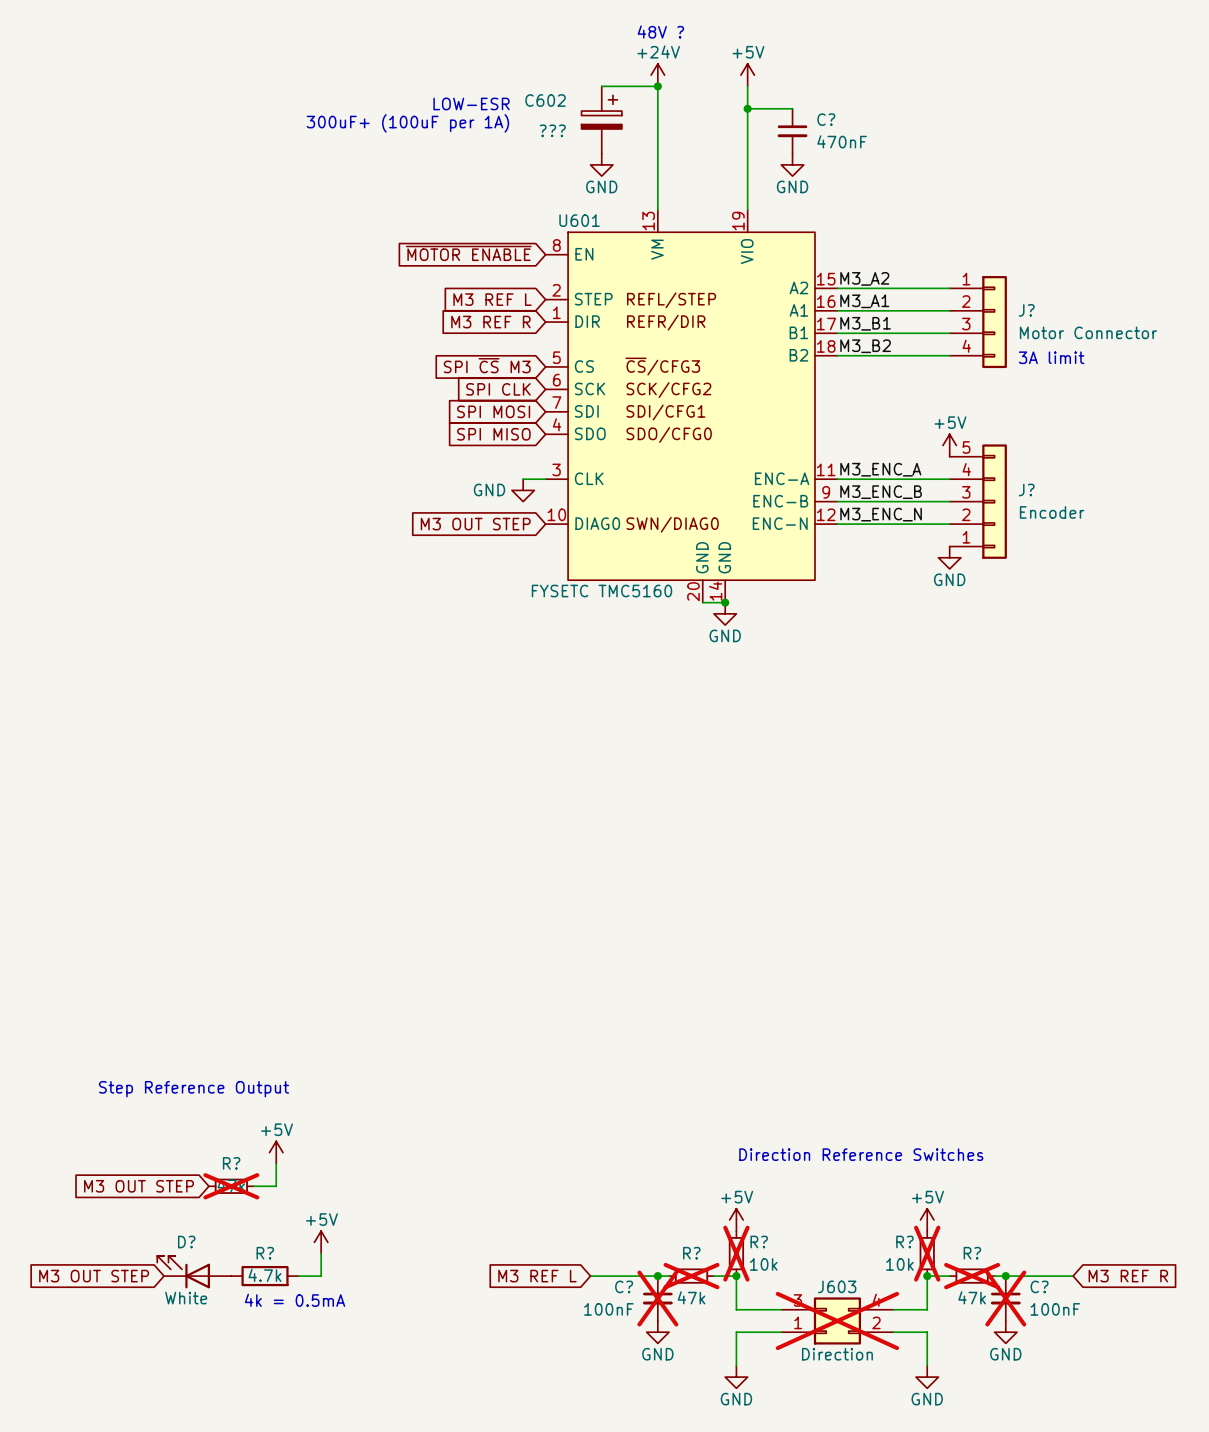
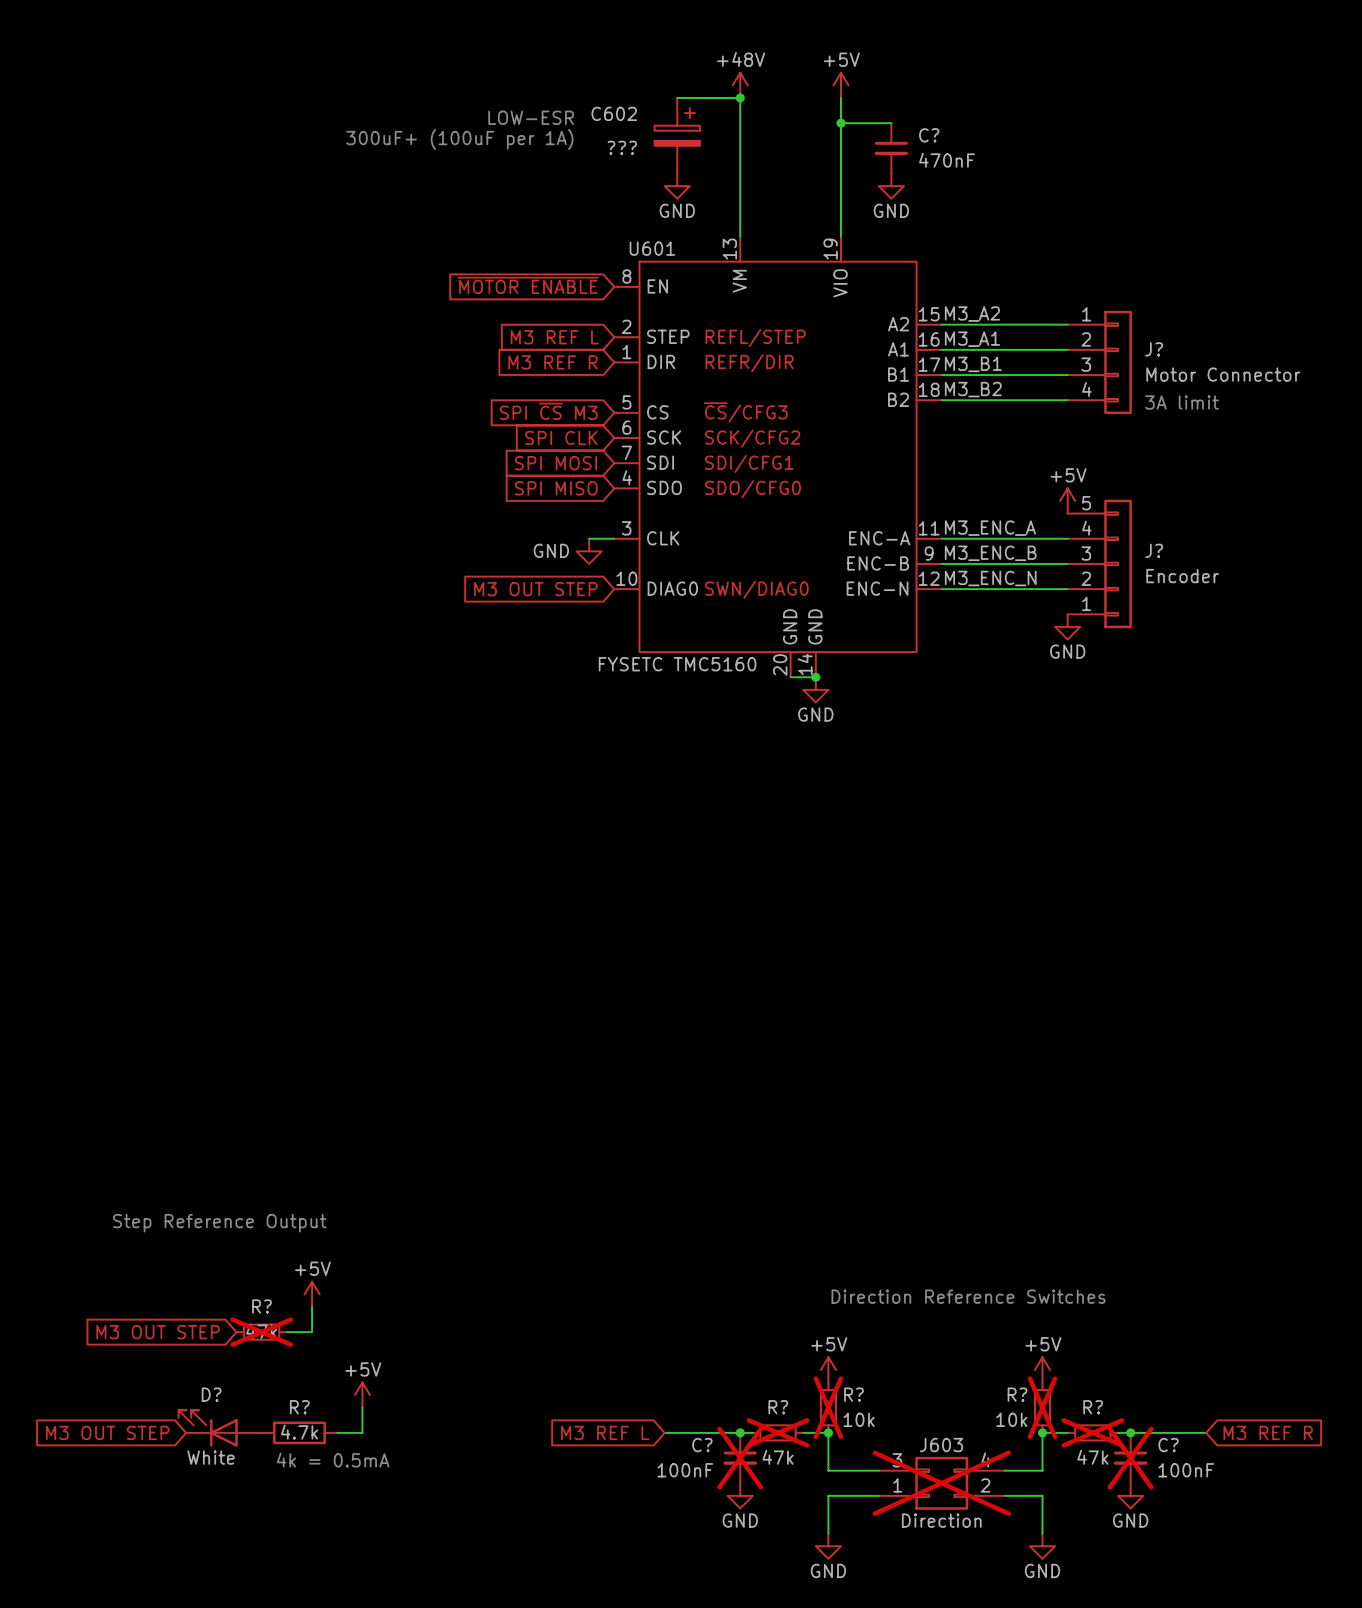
text: 48V ? (660, 31) -> none
power symbol: +24V (657, 75) -> +48V (740, 85)

